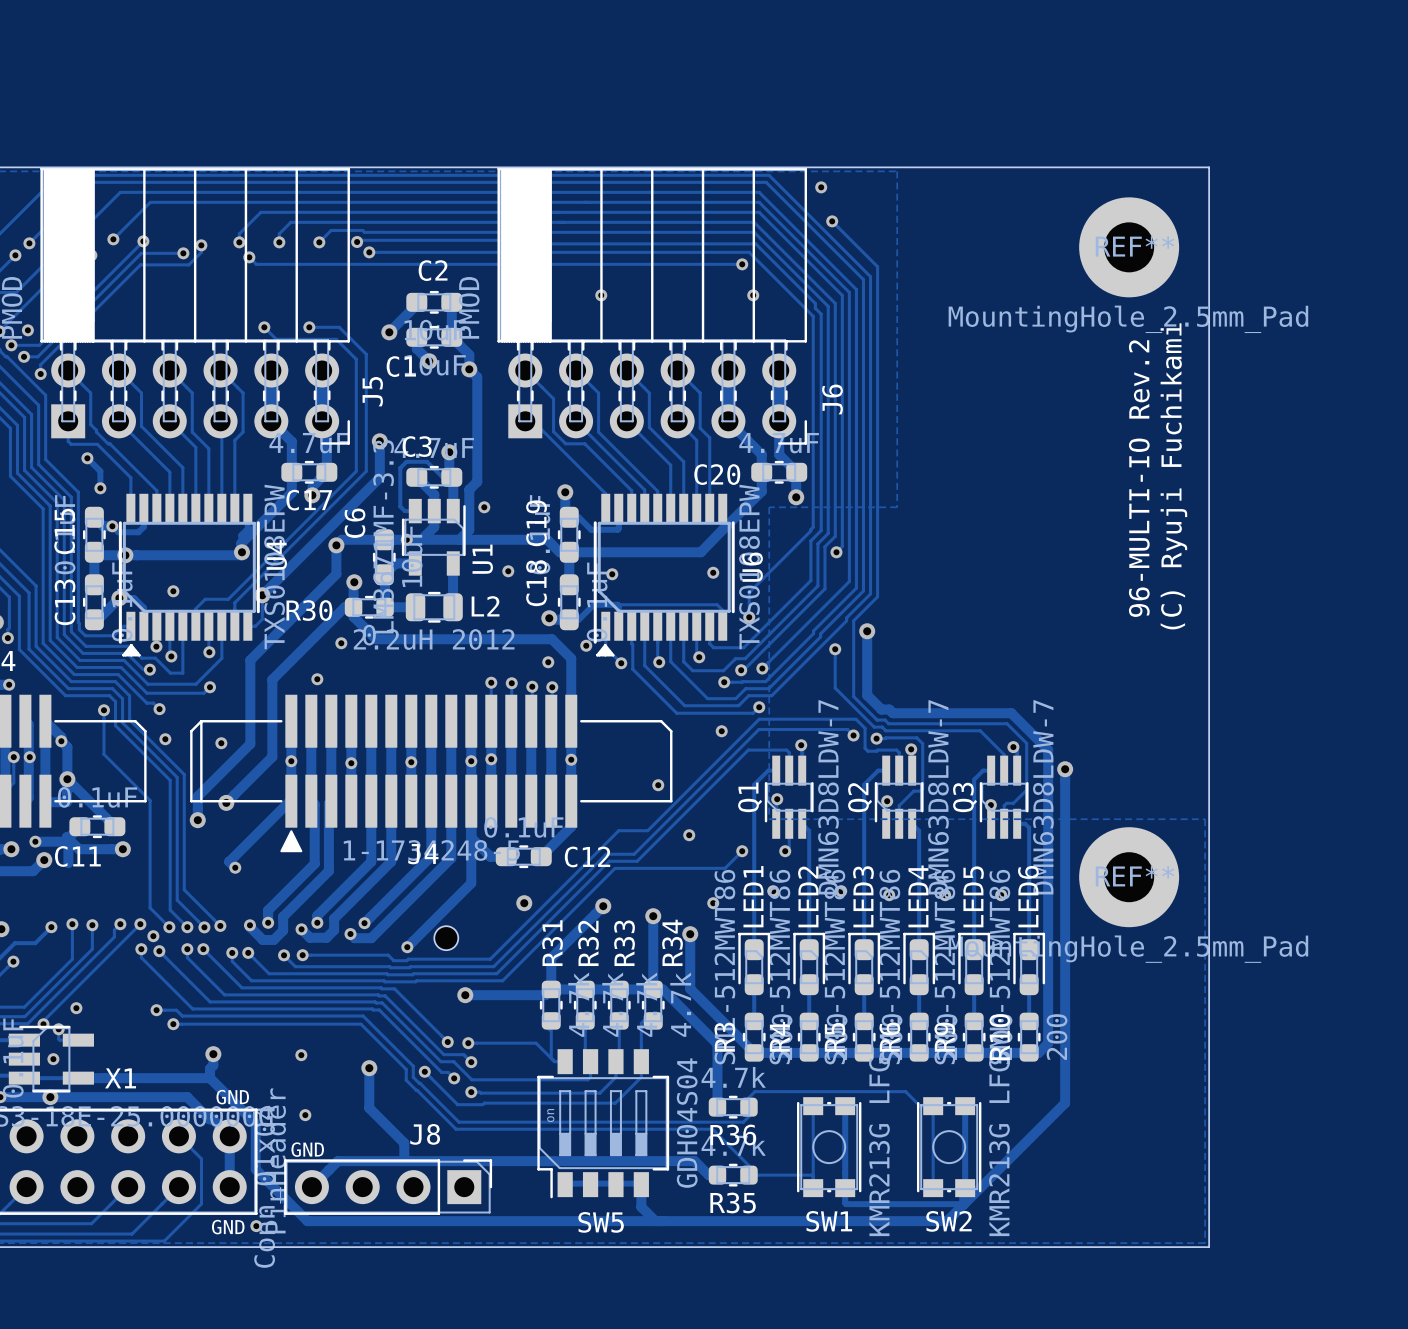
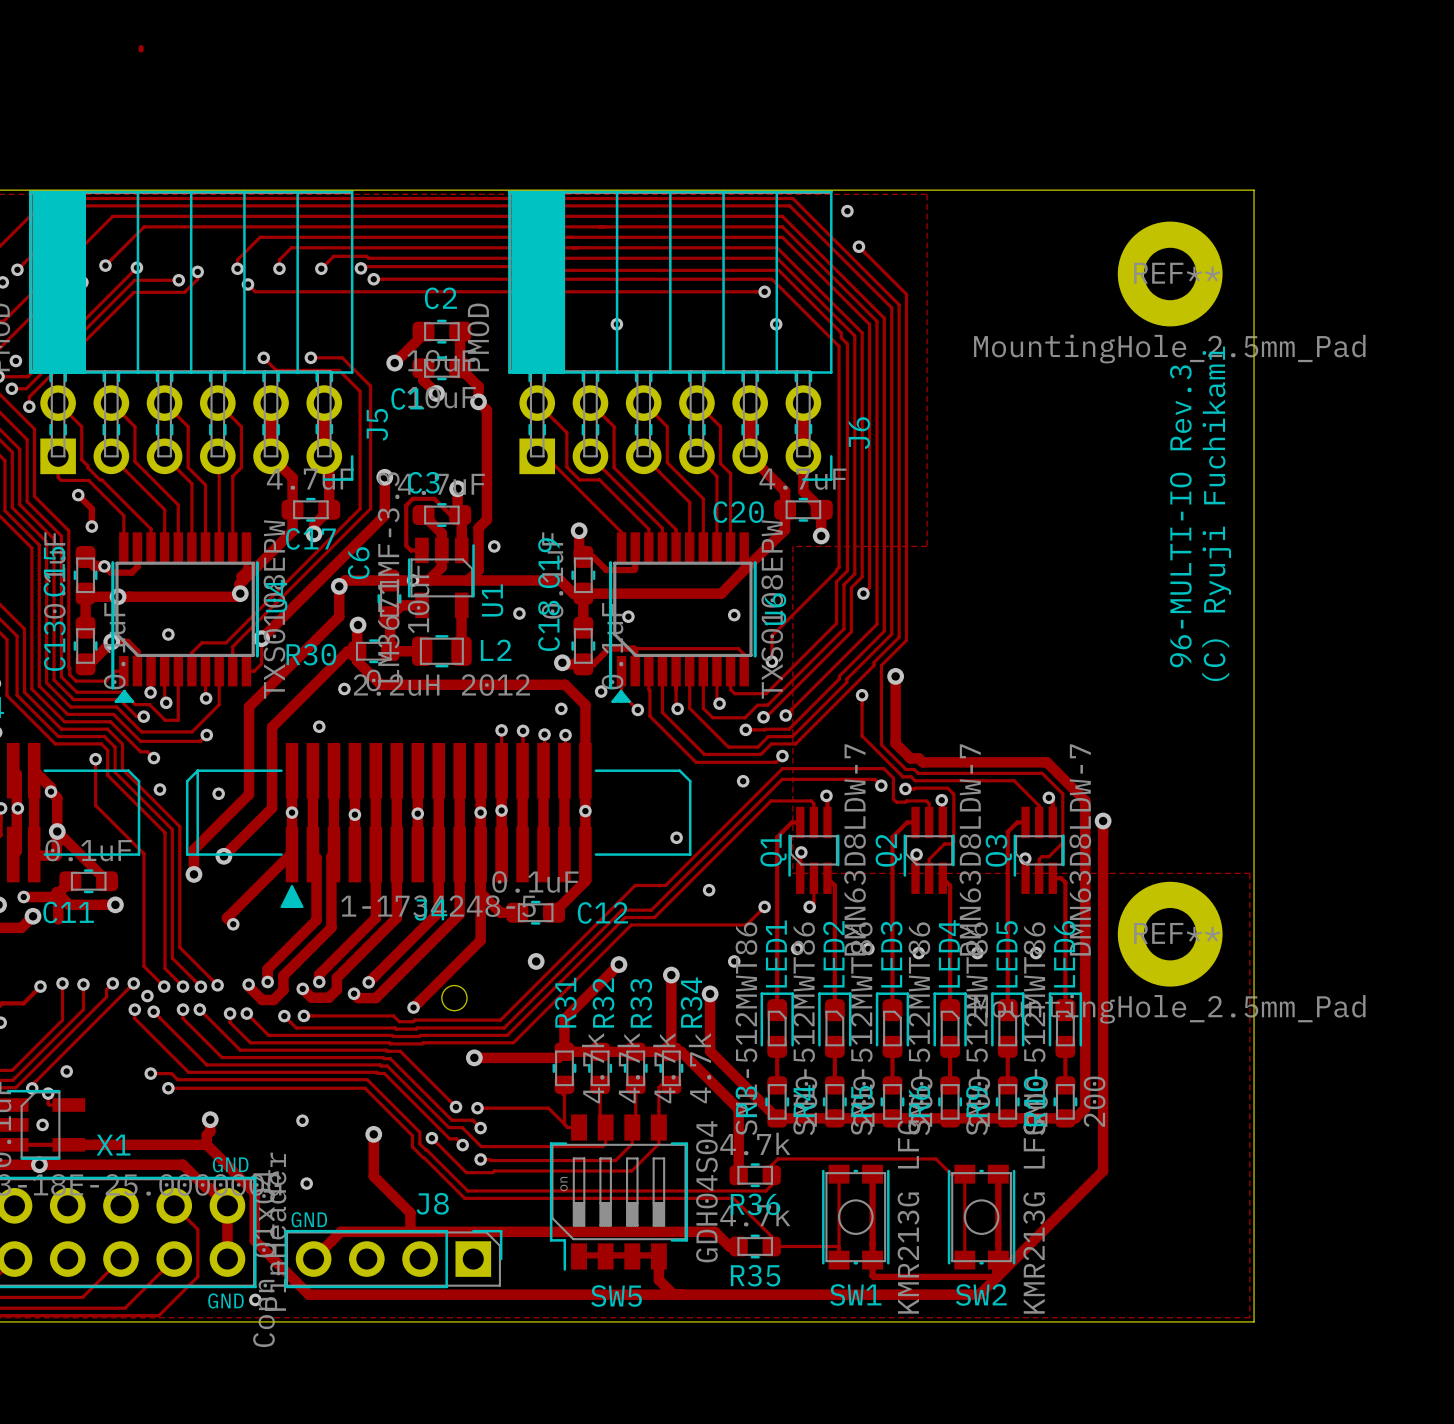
track: none -> (141, 47) (141, 49)
text: 96-MULTI-IO Rev.2 (1139, 478) -> 96-MULTI-IO Rev.3 (1180, 516)

